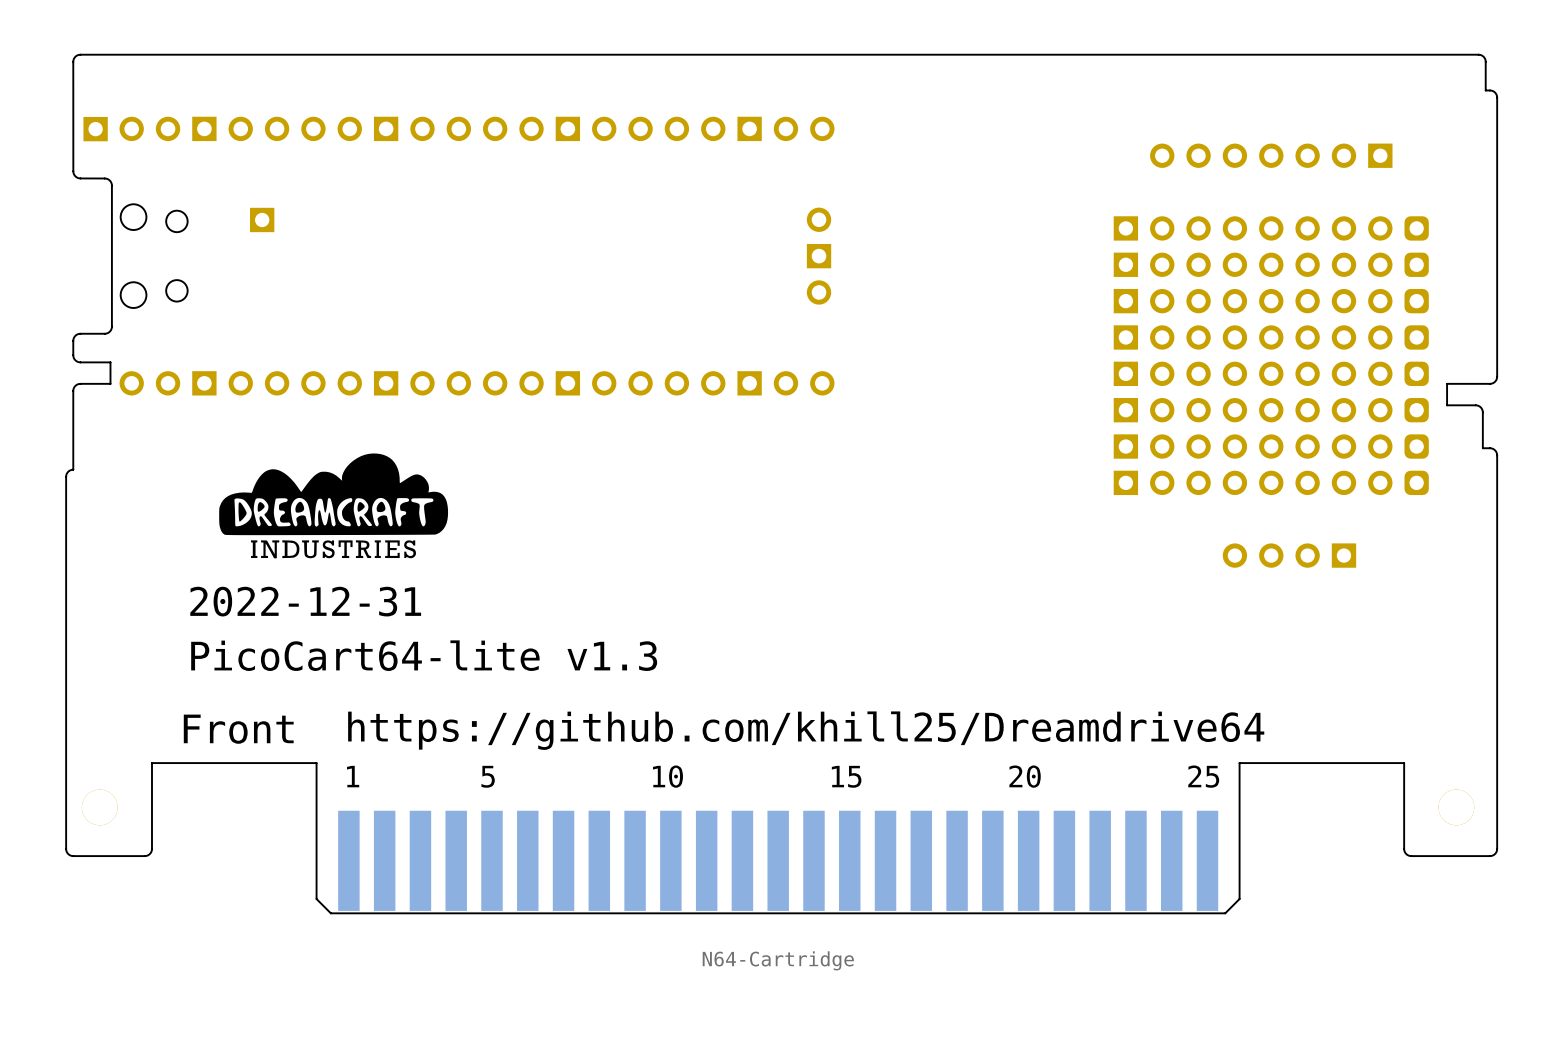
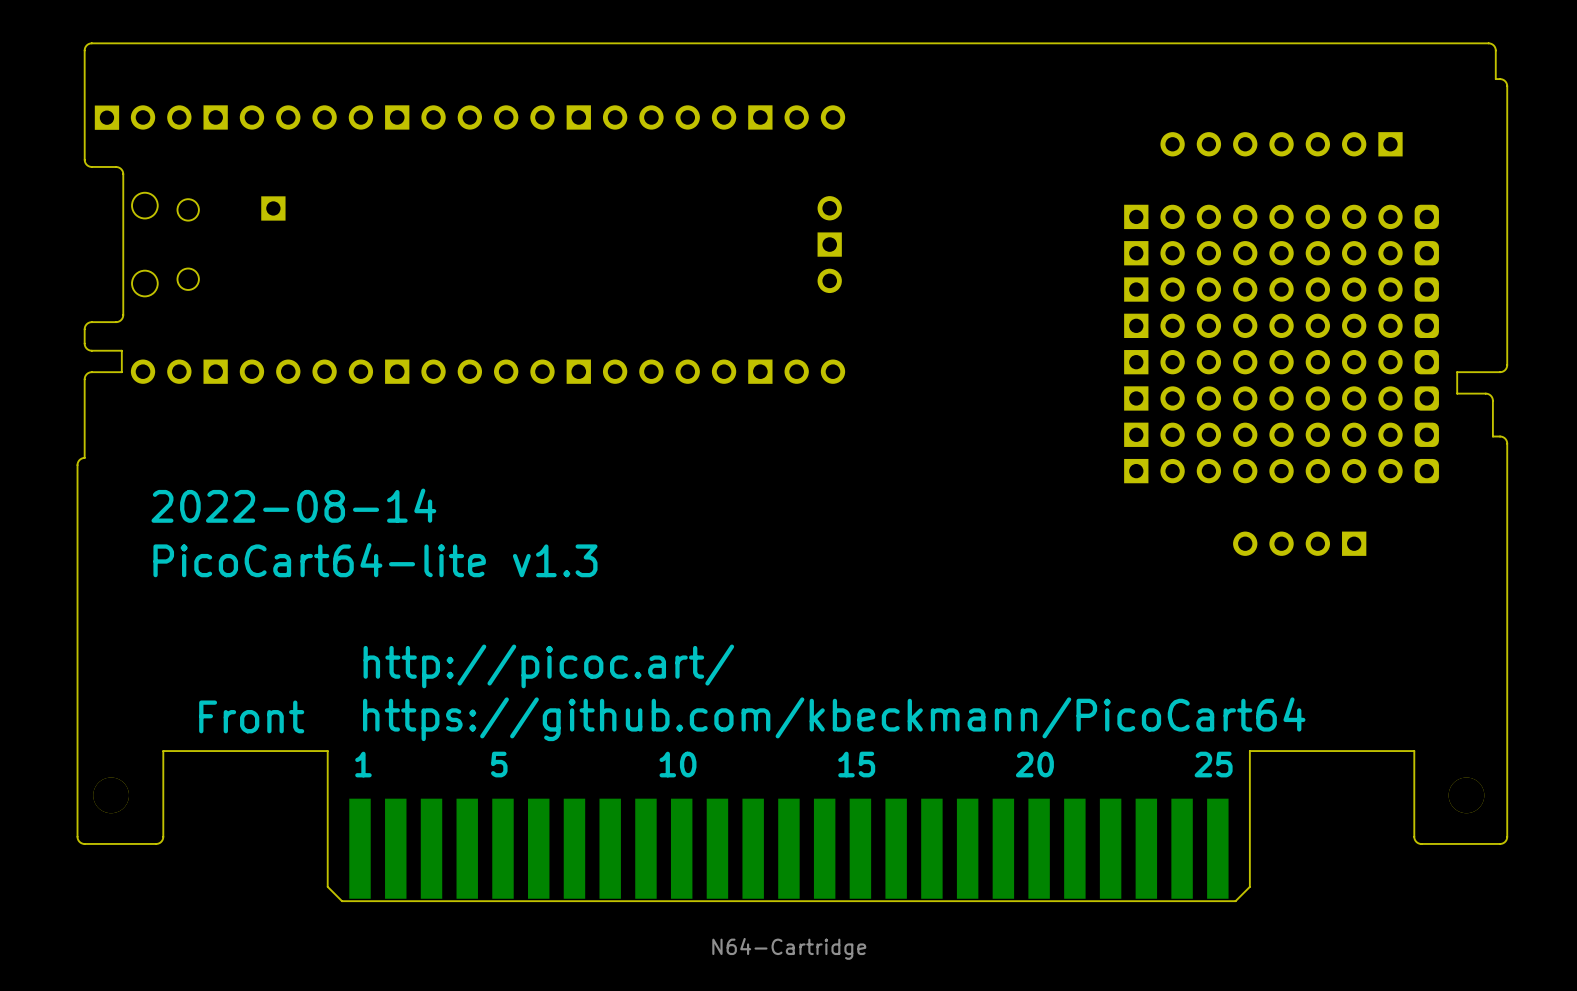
drawing: [219, 453, 449, 559] -> none
part text: none -> 2022-08-14 (293, 505)
part text: 2022-12-31 (305, 601) -> none
part text position: PicoCart64-lite v1.3 (424, 655) -> PicoCart64-lite v1.3 (375, 560)
part text: none -> http://picoc.art/ (548, 666)
part text: https://github.com/khill25/Dreamdrive64 (806, 730) -> https://github.com/kbeckmann/PicoCart64 (834, 719)

